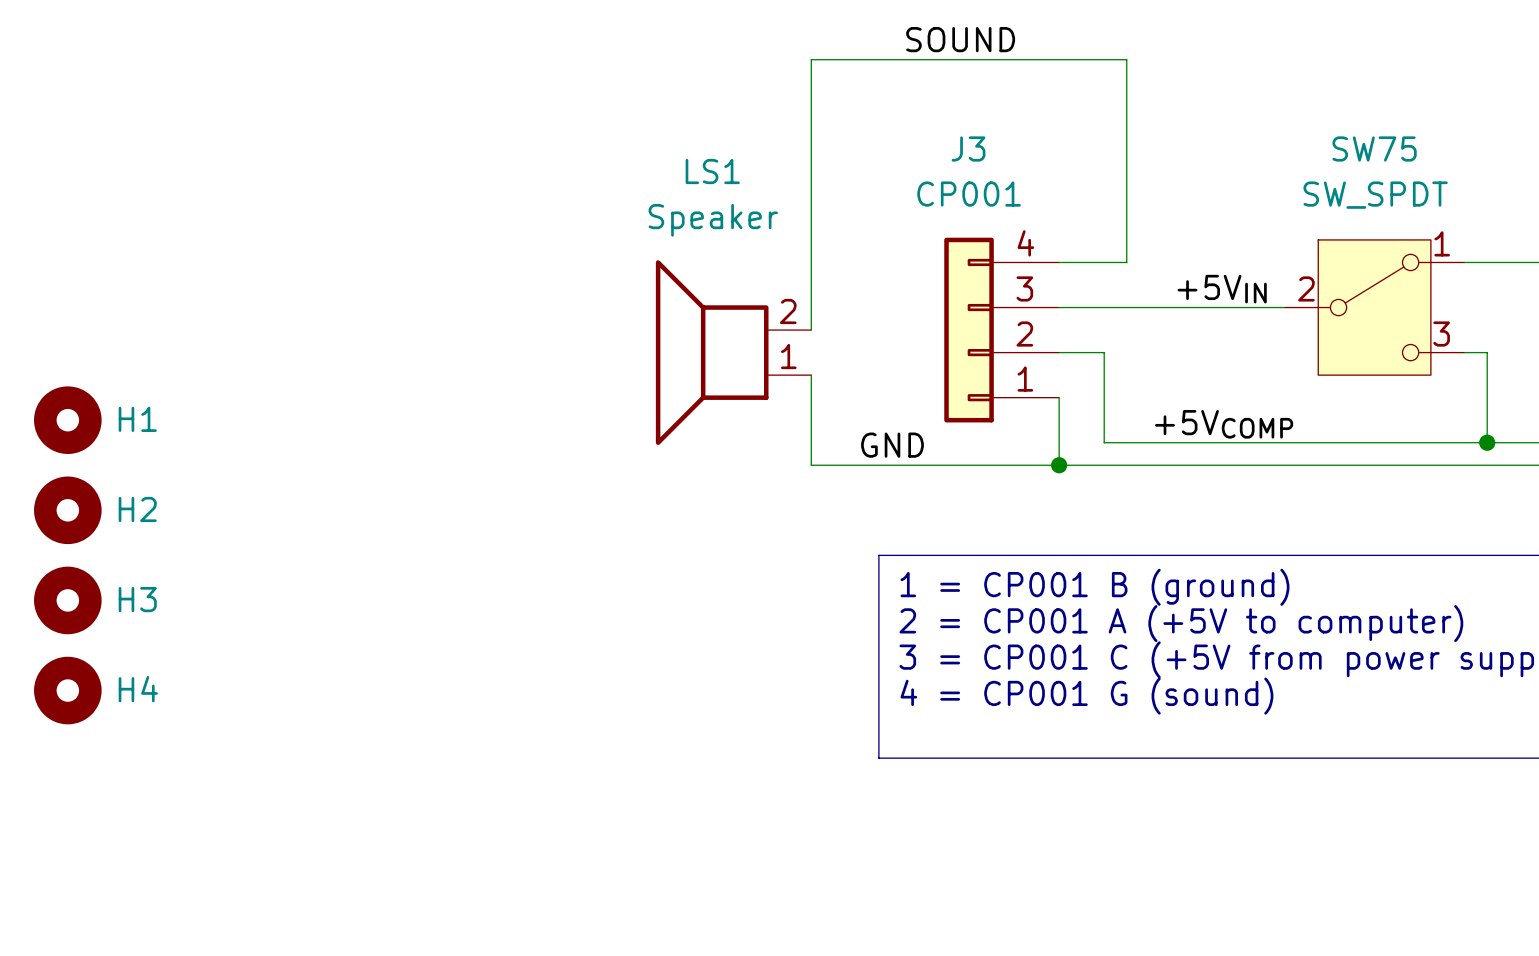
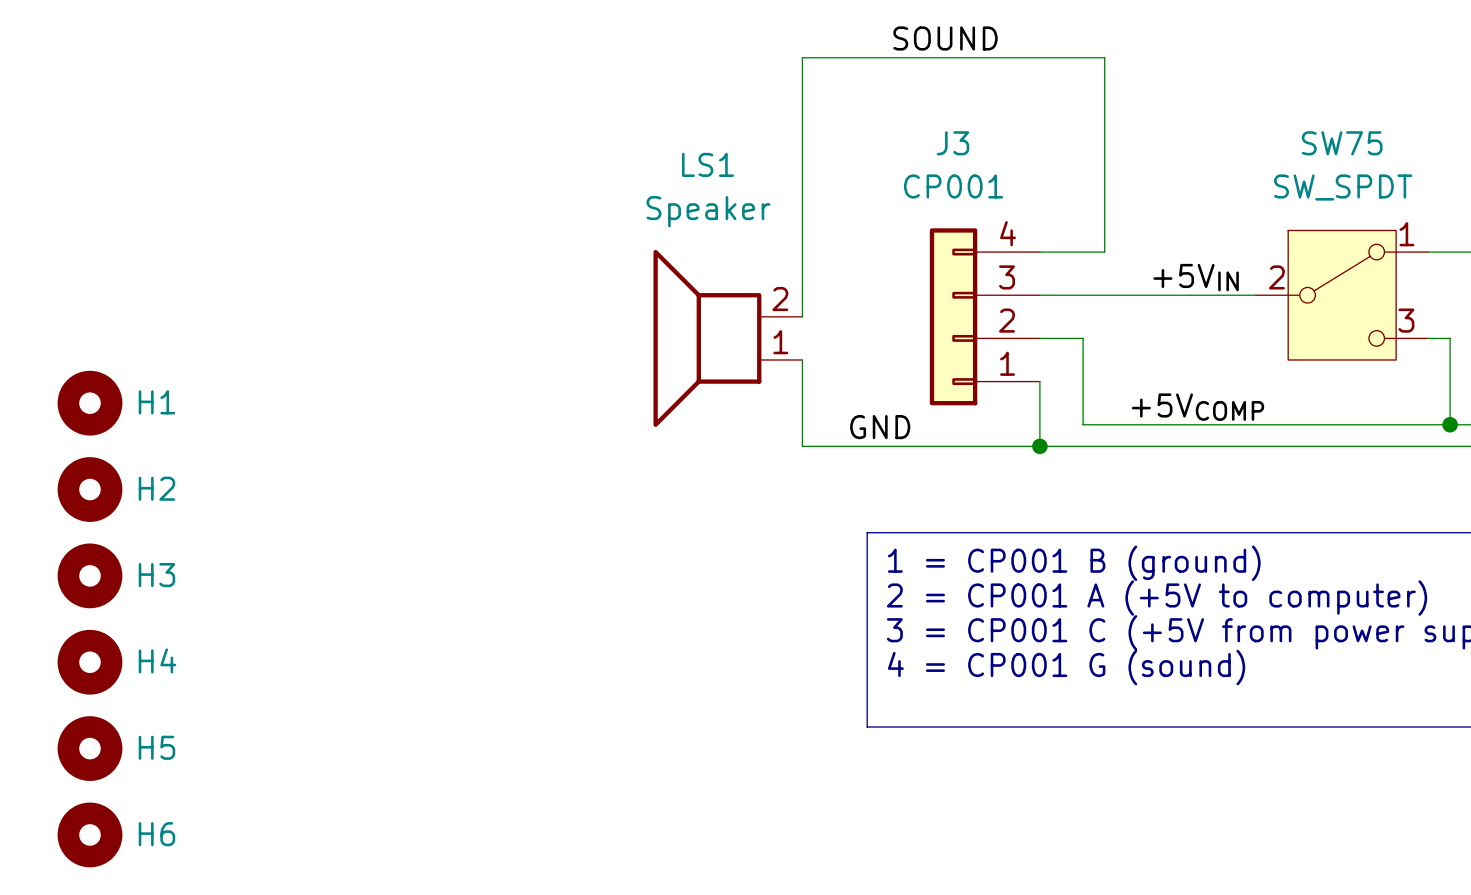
H5: none -> (89, 748)
H6: none -> (89, 834)

